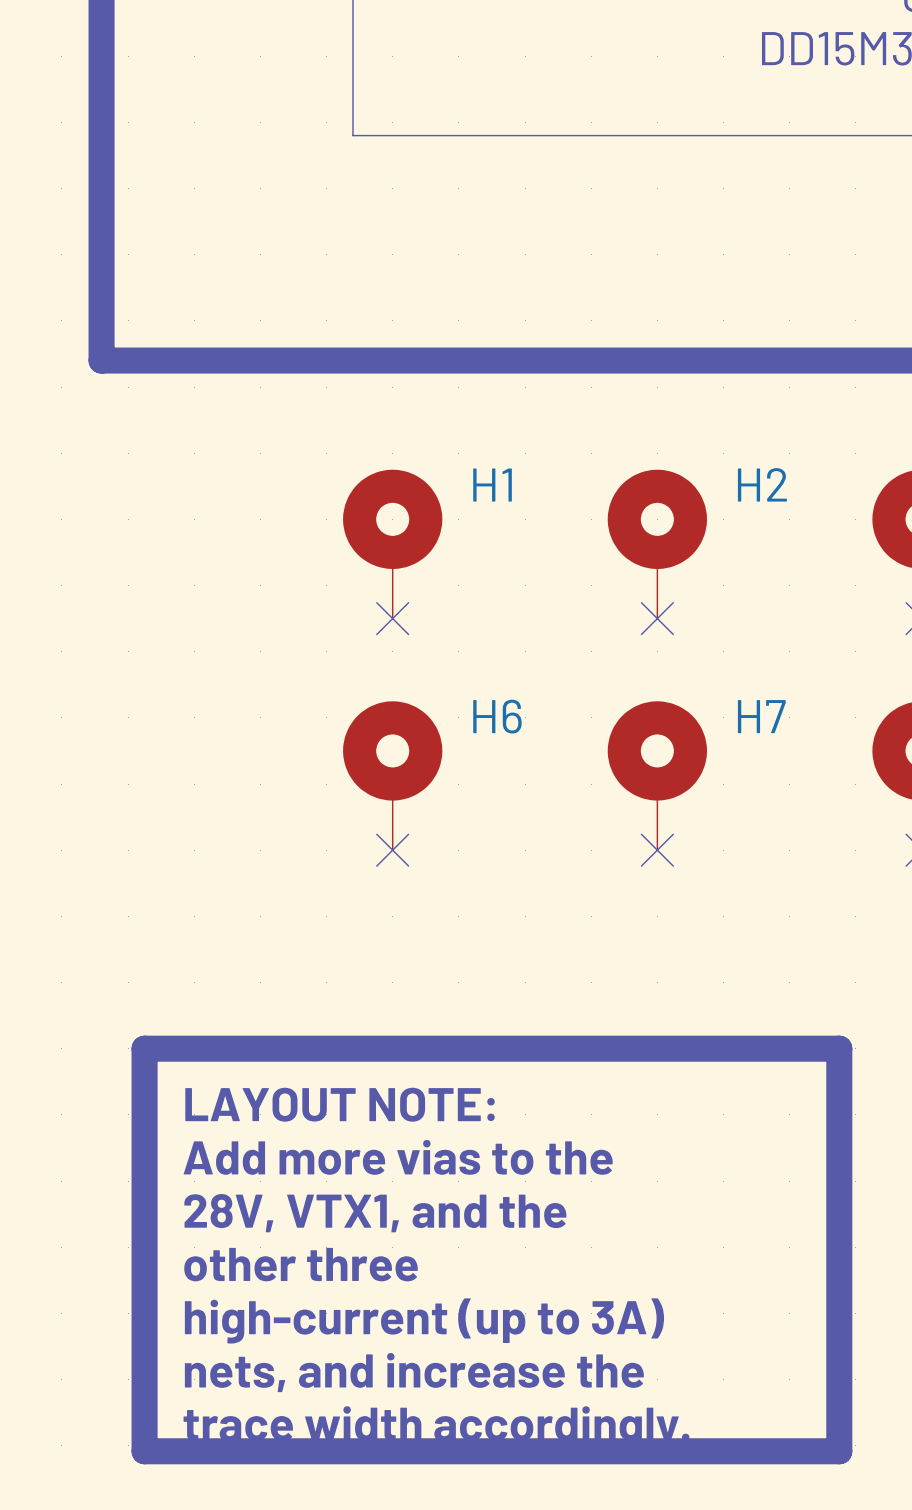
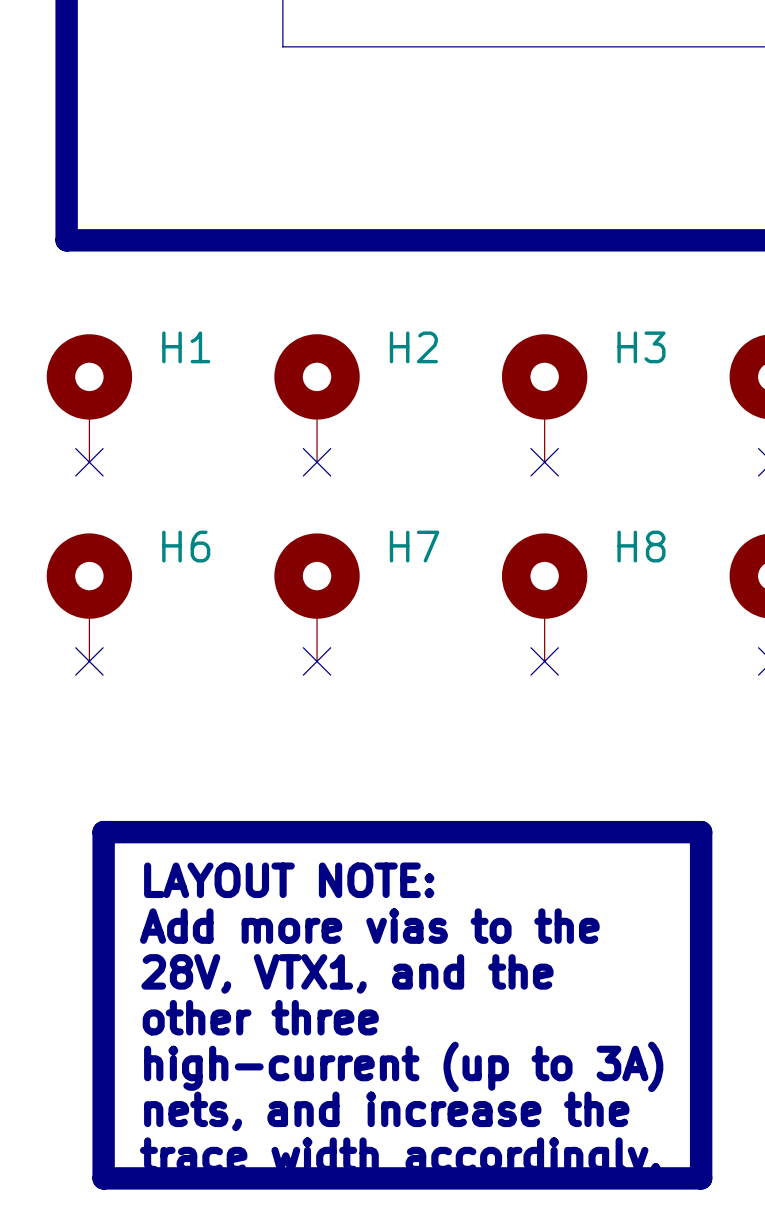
H2 name: H2 (762, 484) -> H3 (641, 347)
H1 name: H1 (492, 485) -> H2 (413, 347)
H1: none -> (89, 398)
no-connect mark: none -> (89, 462)
H6 name: H6 (497, 716) -> H7 (414, 546)
H7 name: H7 (761, 716) -> H8 (641, 546)
H6: none -> (89, 597)
no-connect mark: none -> (89, 661)

